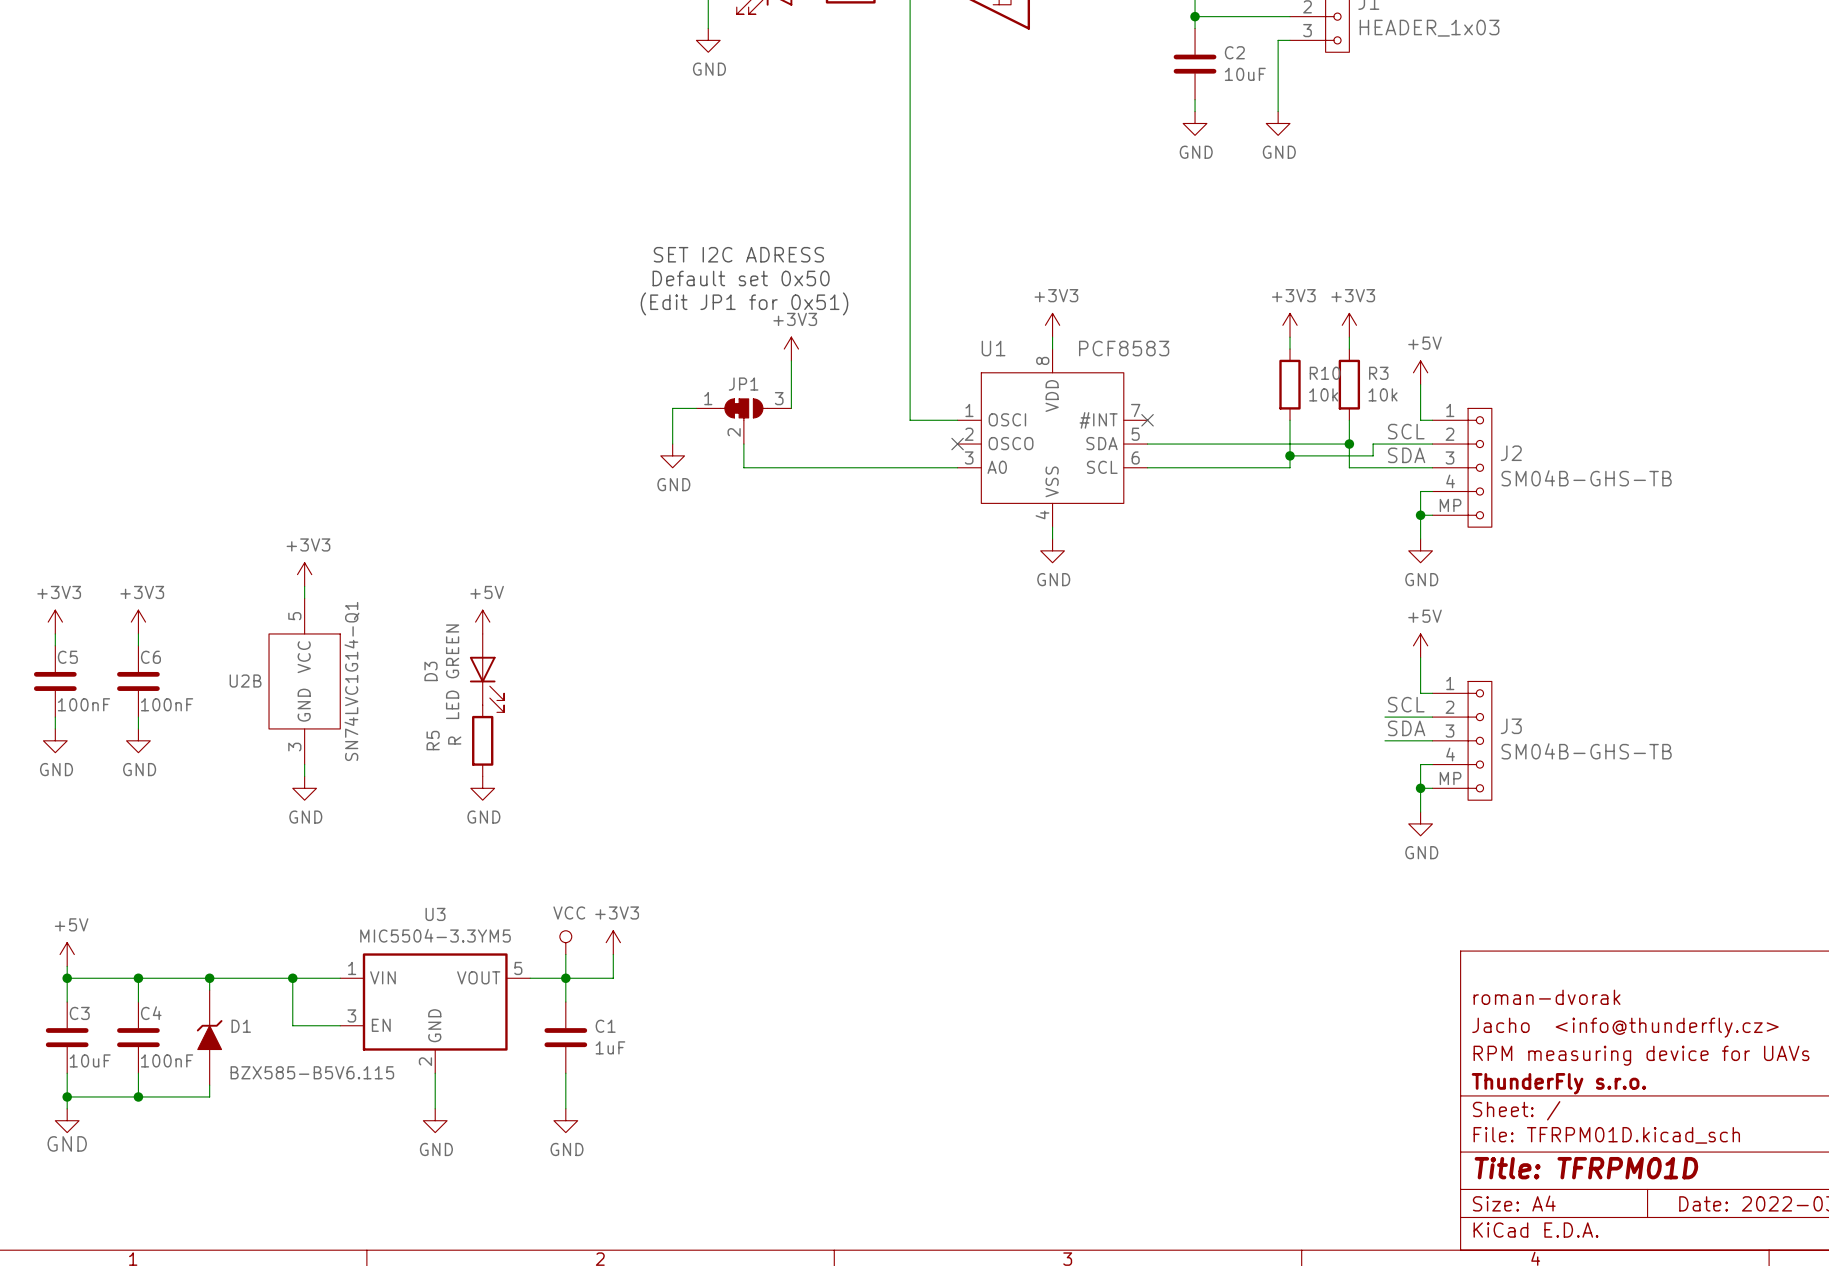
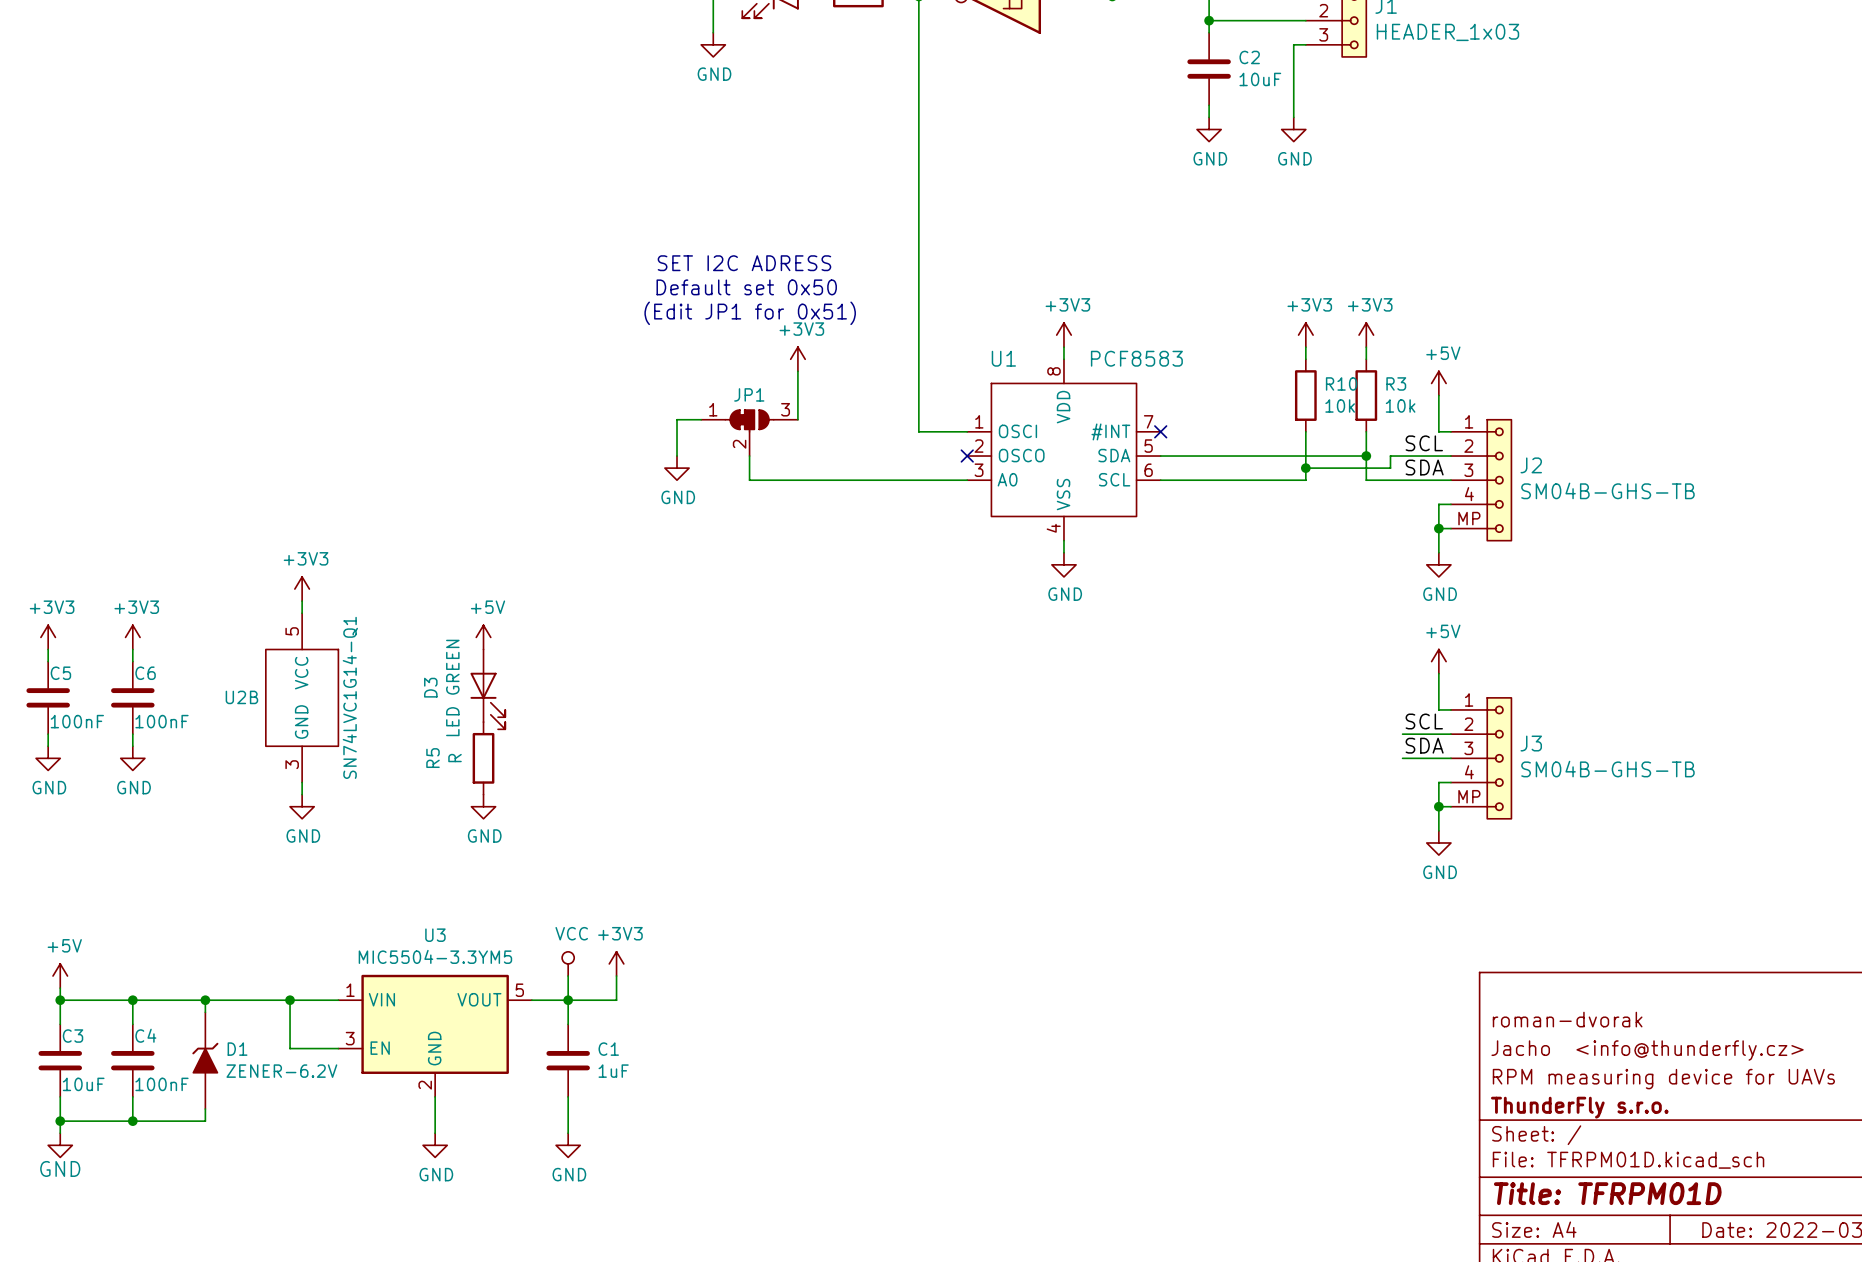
D1 value: BZX585-B5V6.115 (312, 1072) -> ZENER-6.2V (281, 1071)

